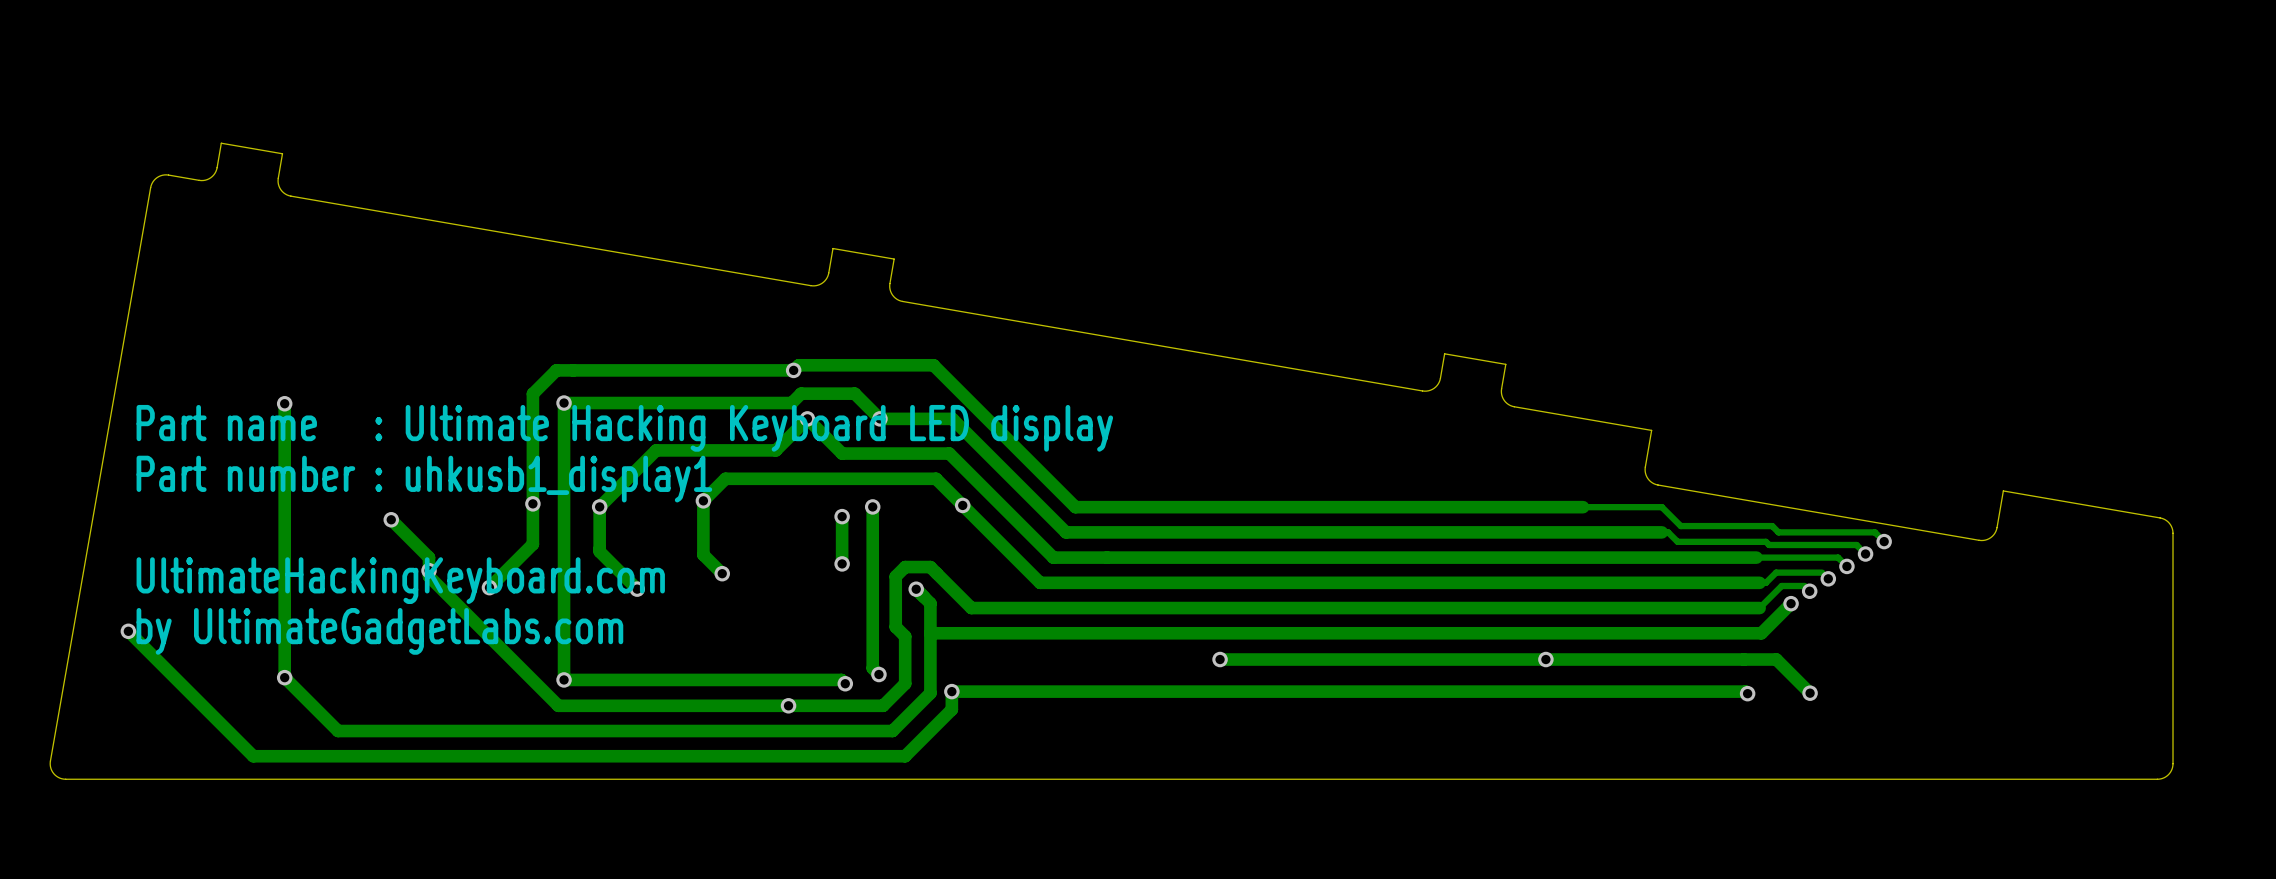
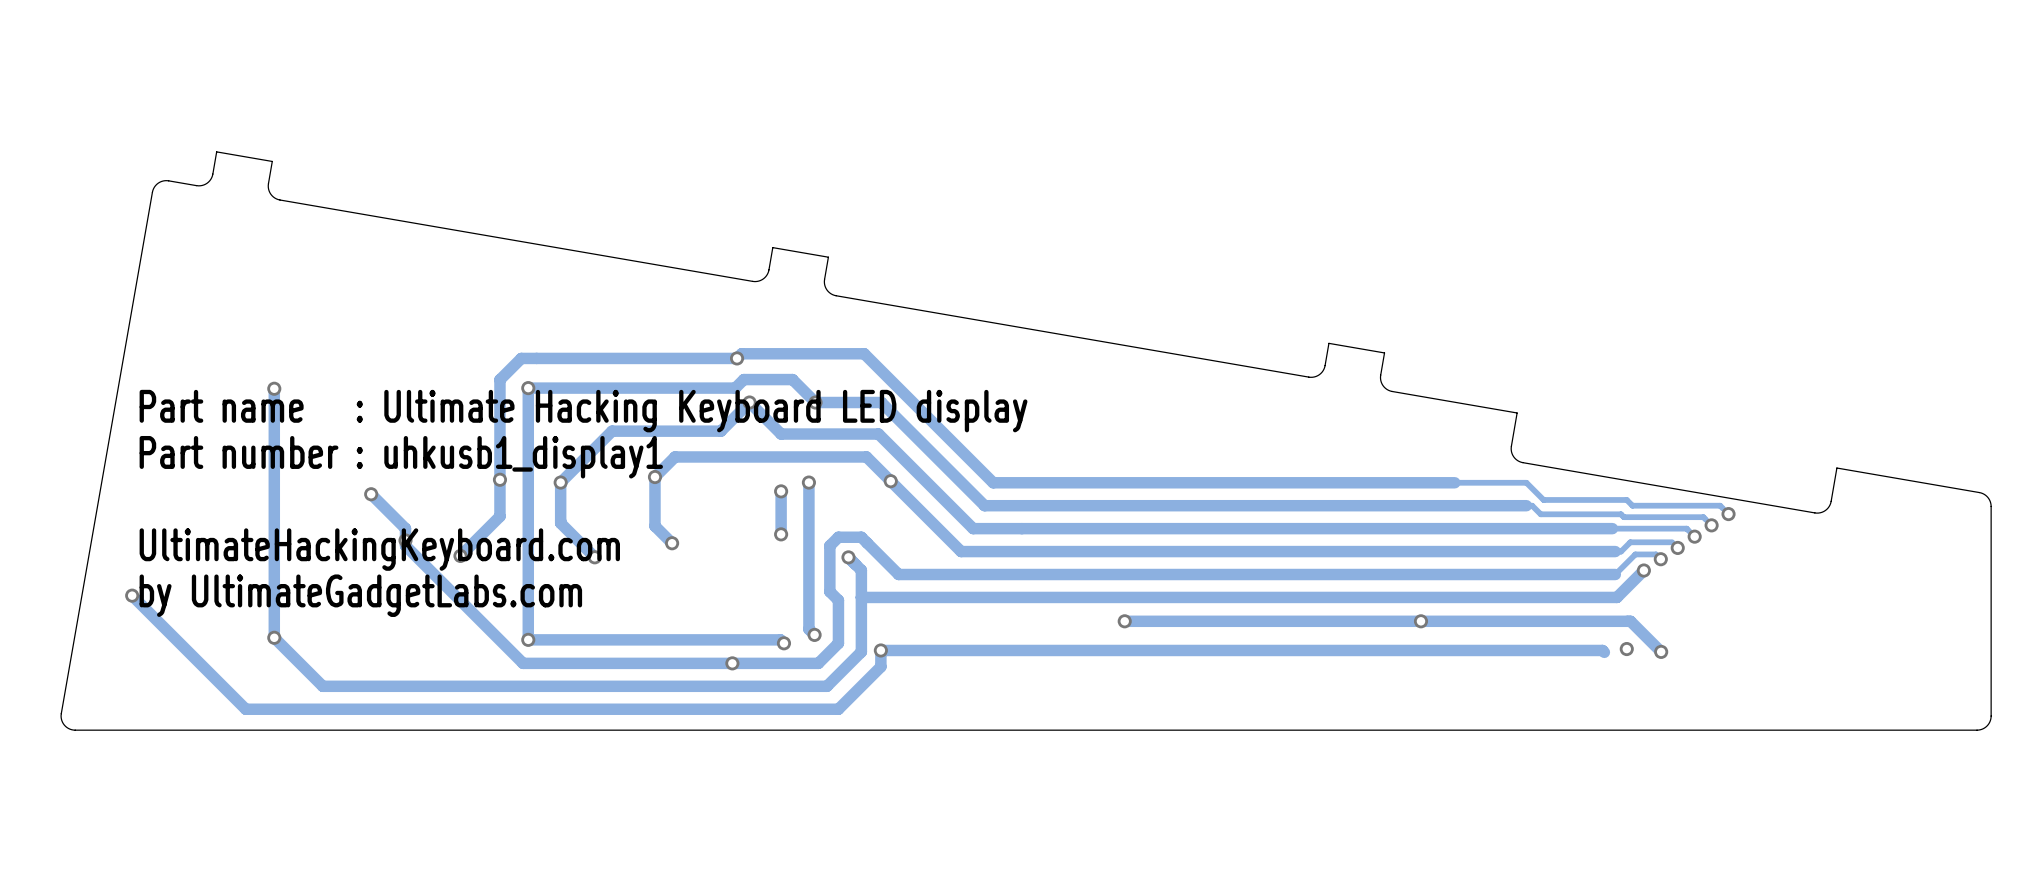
via position: (1747, 693) -> (1626, 649)

